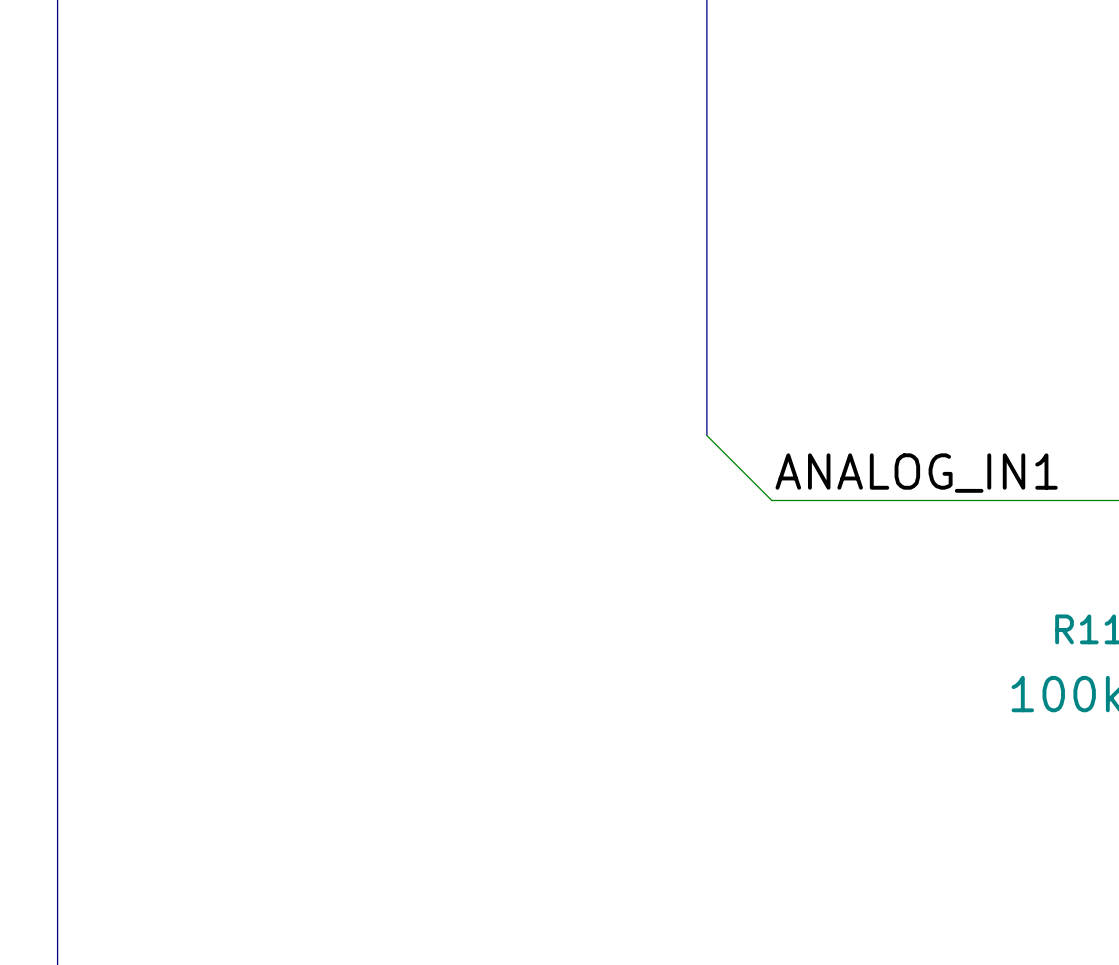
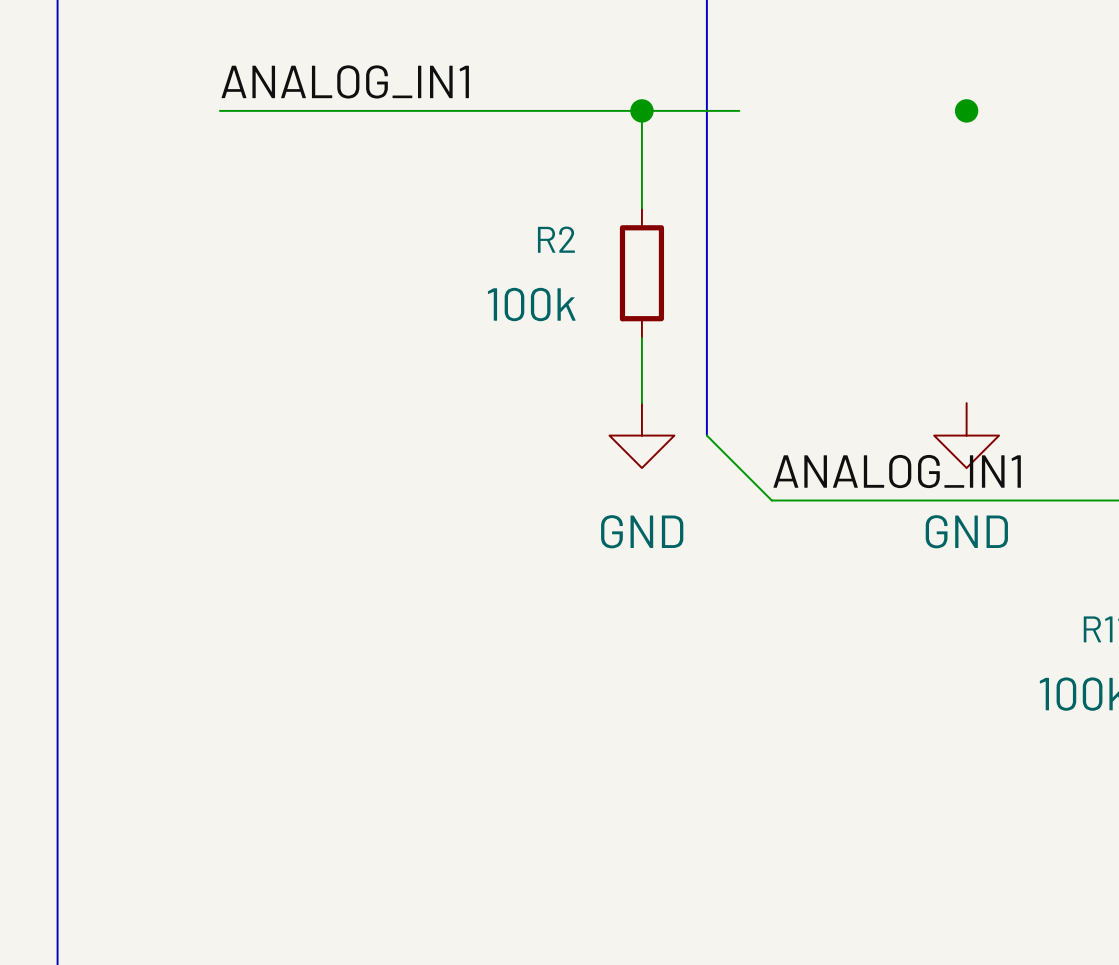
label: none -> ANALOG_IN1 (345, 81)
wire: none -> (219, 110) (739, 110)
wire: none -> (641, 110) (641, 208)
junction: none -> (641, 110)
junction: none -> (966, 110)
R2: none -> 100k (641, 273)
wire: none -> (641, 338) (641, 403)
power symbol: none -> GND (641, 435)
power symbol: none -> GND (966, 435)

